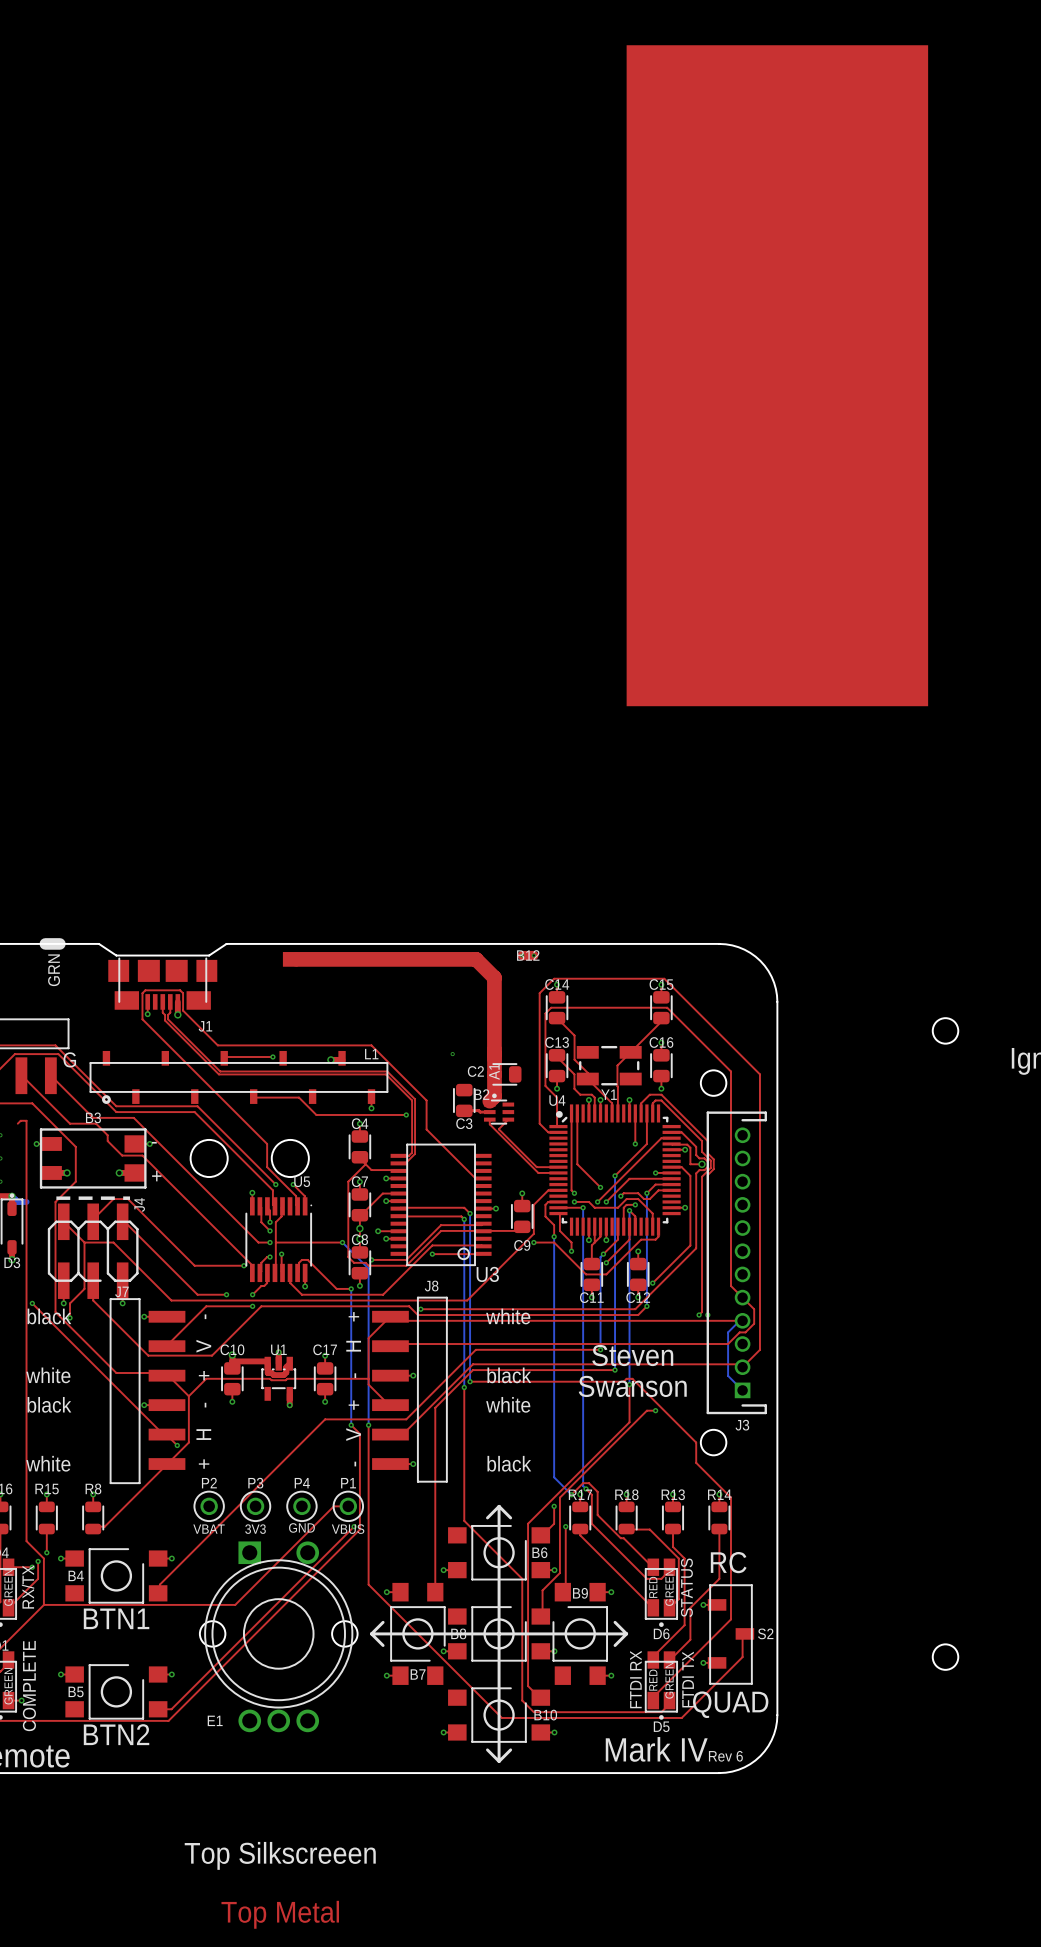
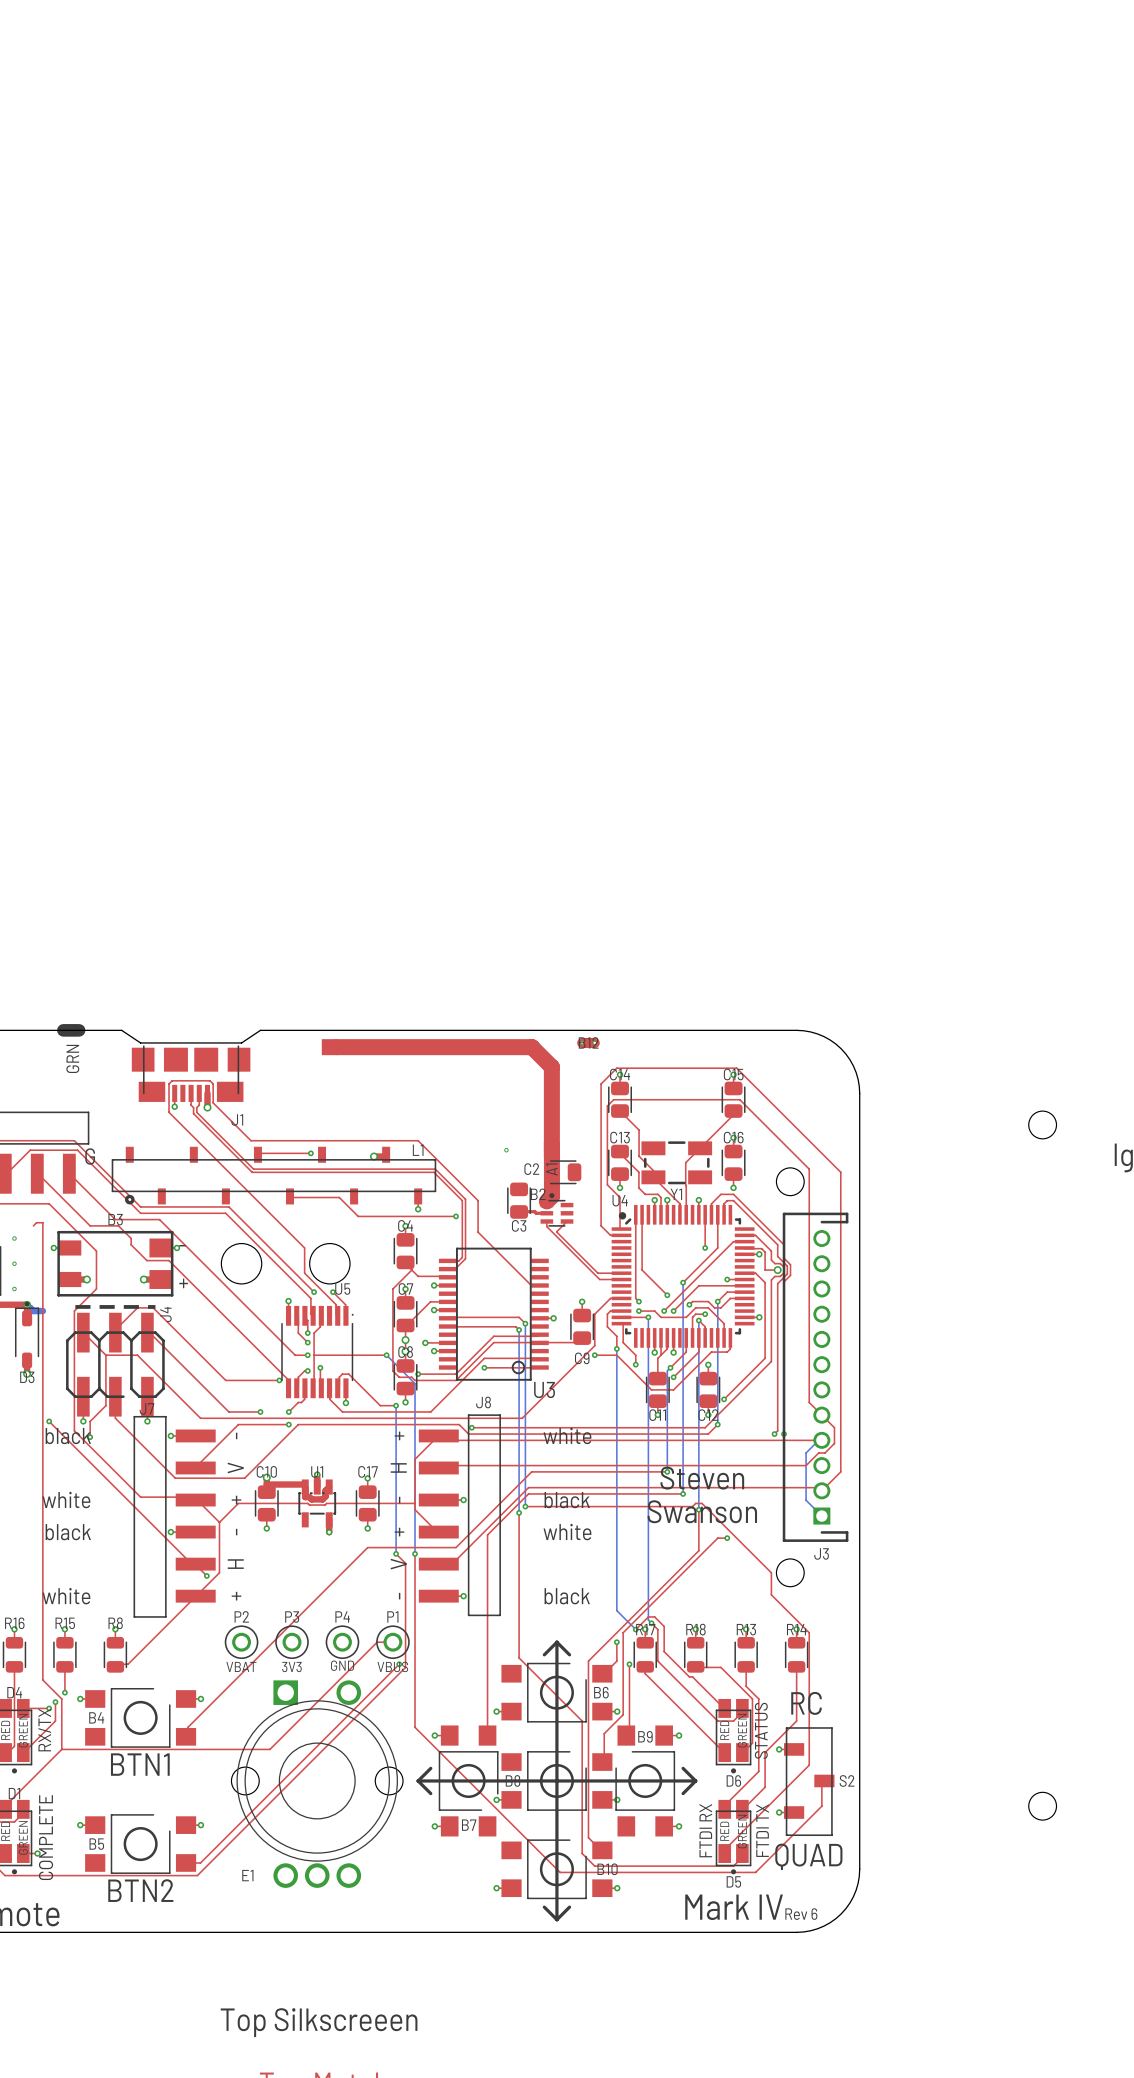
drawing: [626, 45, 929, 707] -> none

